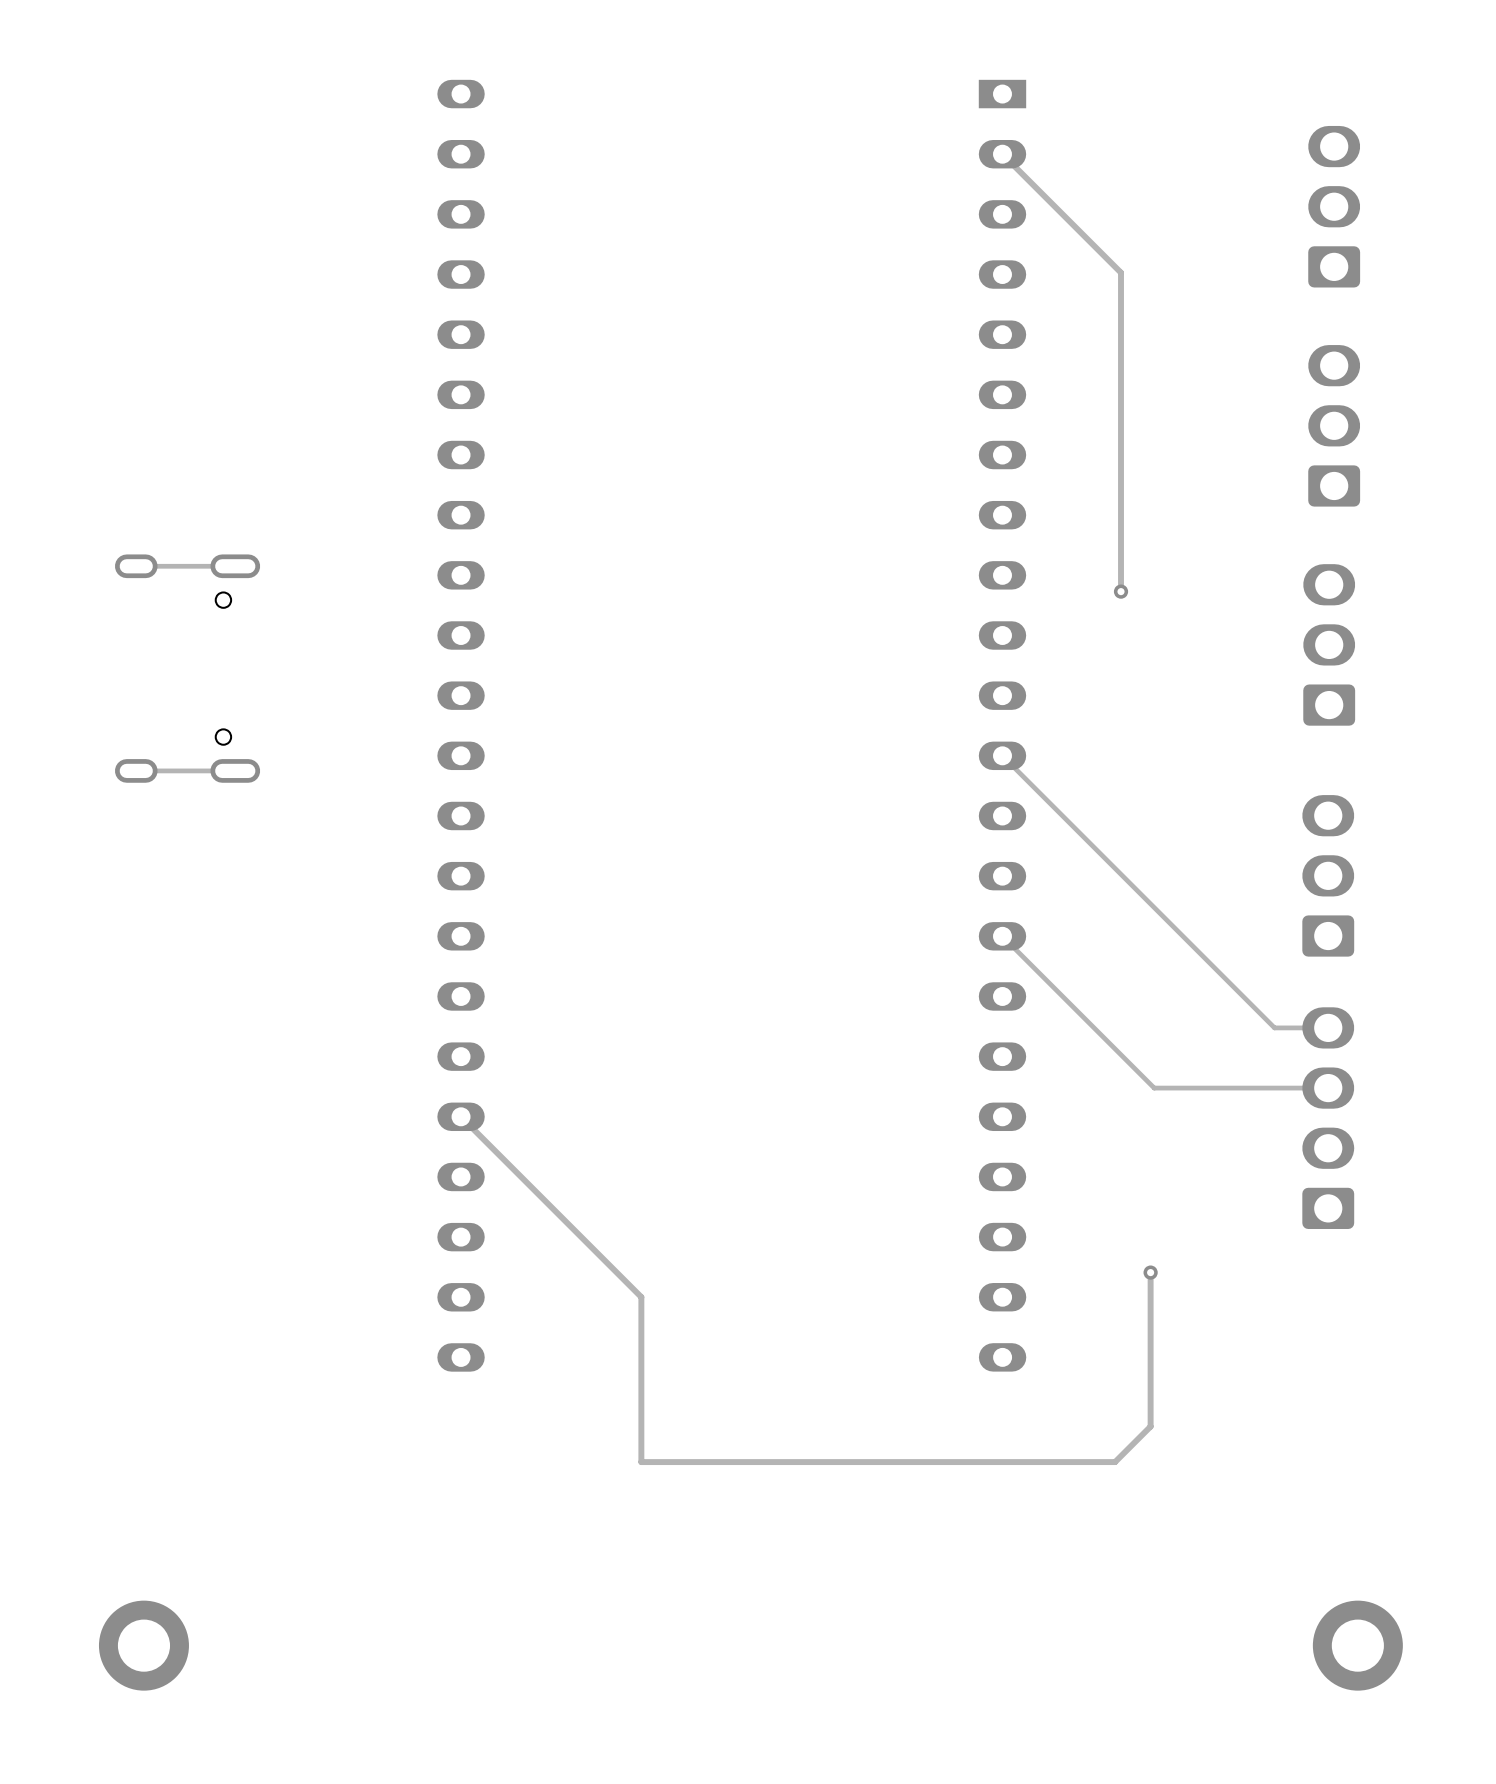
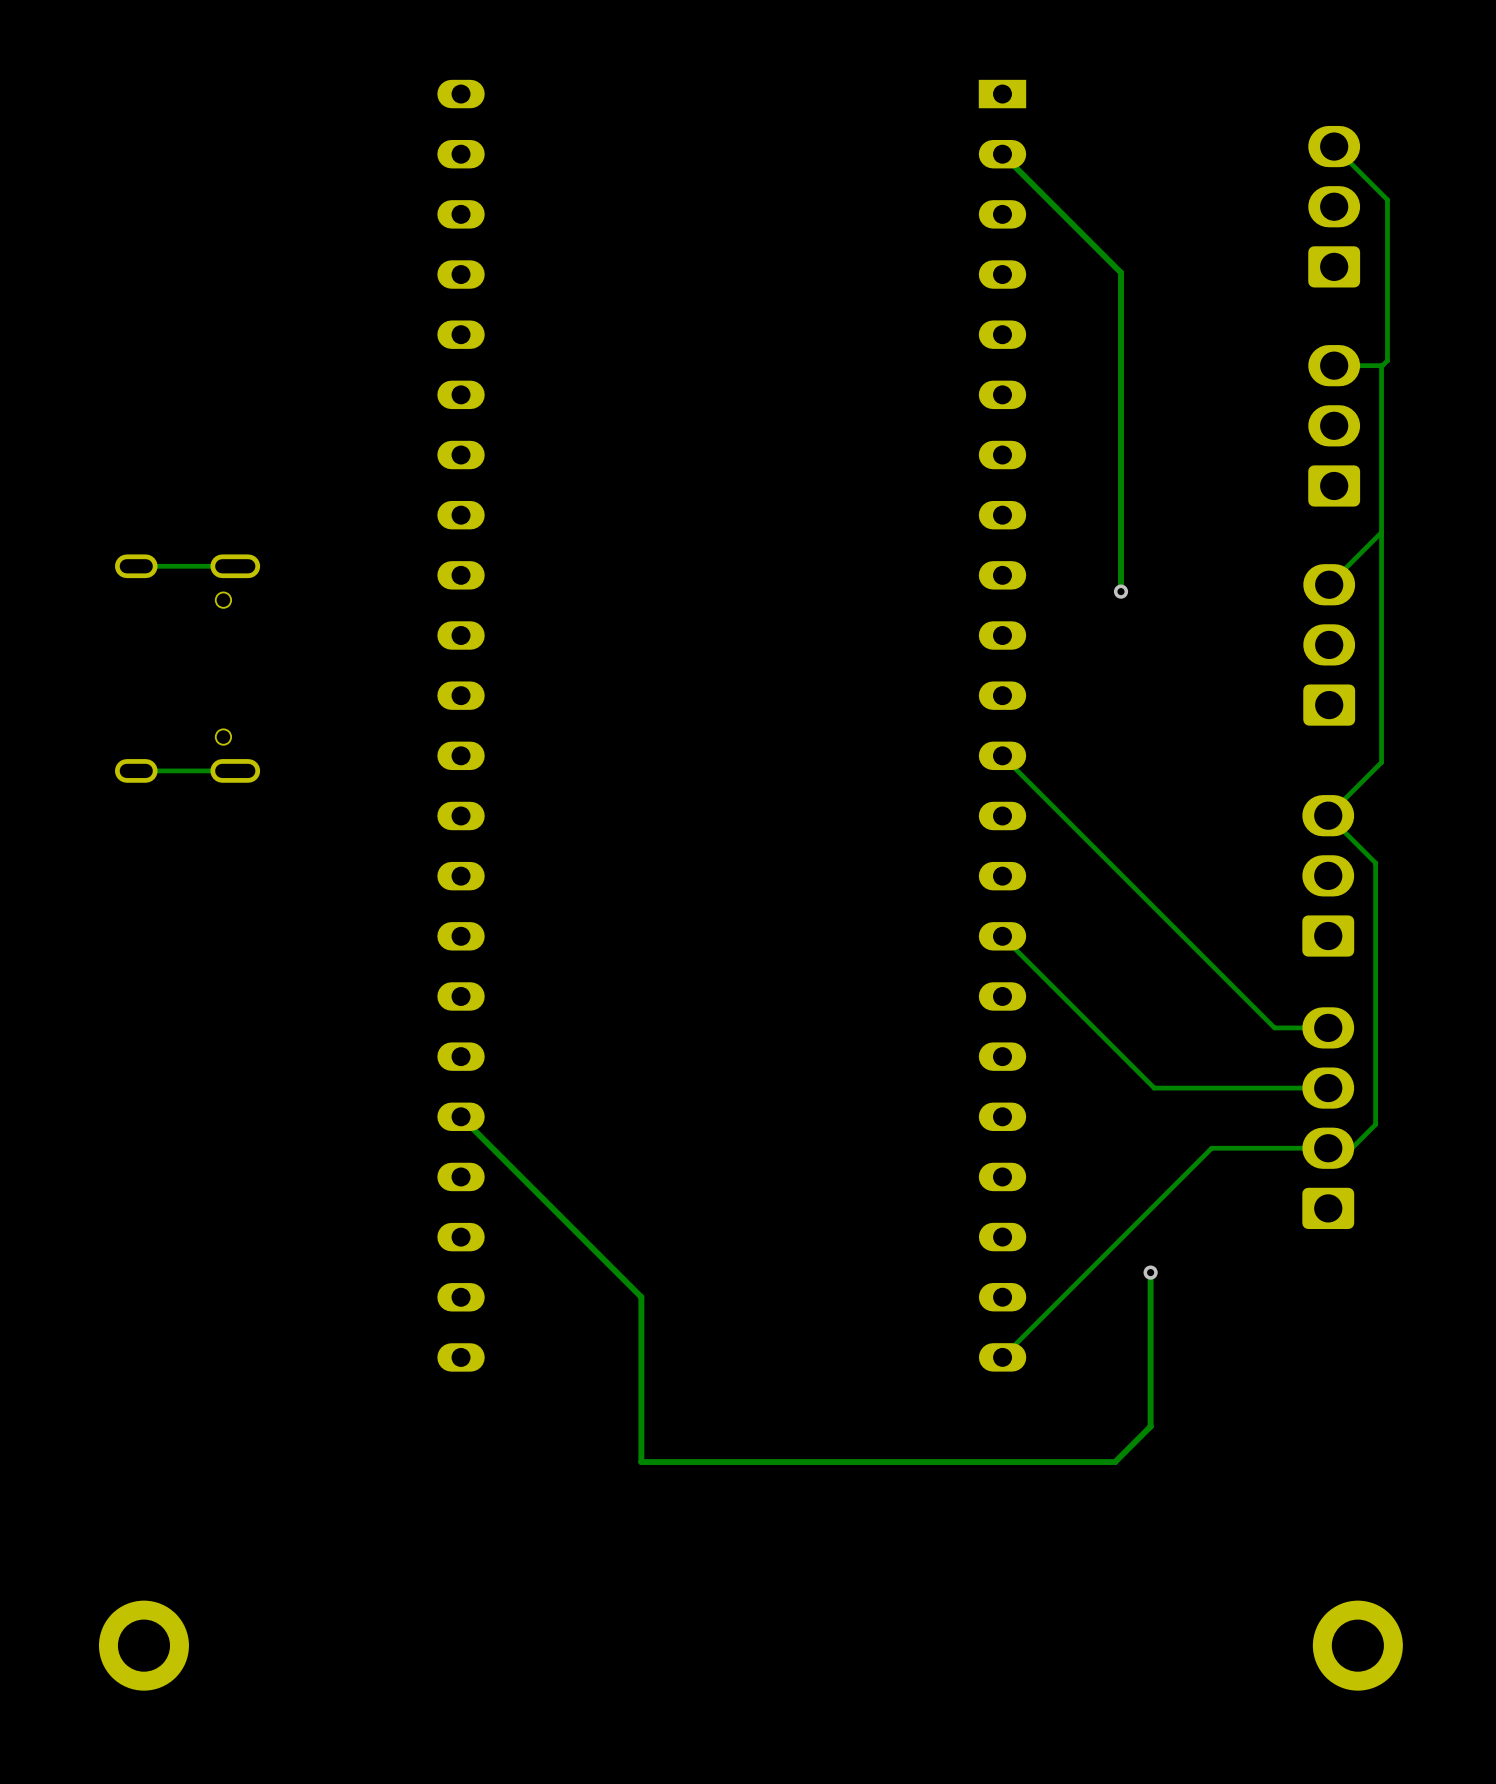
track: none -> (1334, 146) (1387, 199) (1387, 360) (1382, 365) (1334, 365)
track: none -> (1381, 365) (1381, 762) (1328, 815) (1375, 863) (1375, 1124) (1351, 1148)
track: none -> (1381, 532) (1329, 584)
track: none -> (1328, 1148) (1211, 1148) (1002, 1357)

